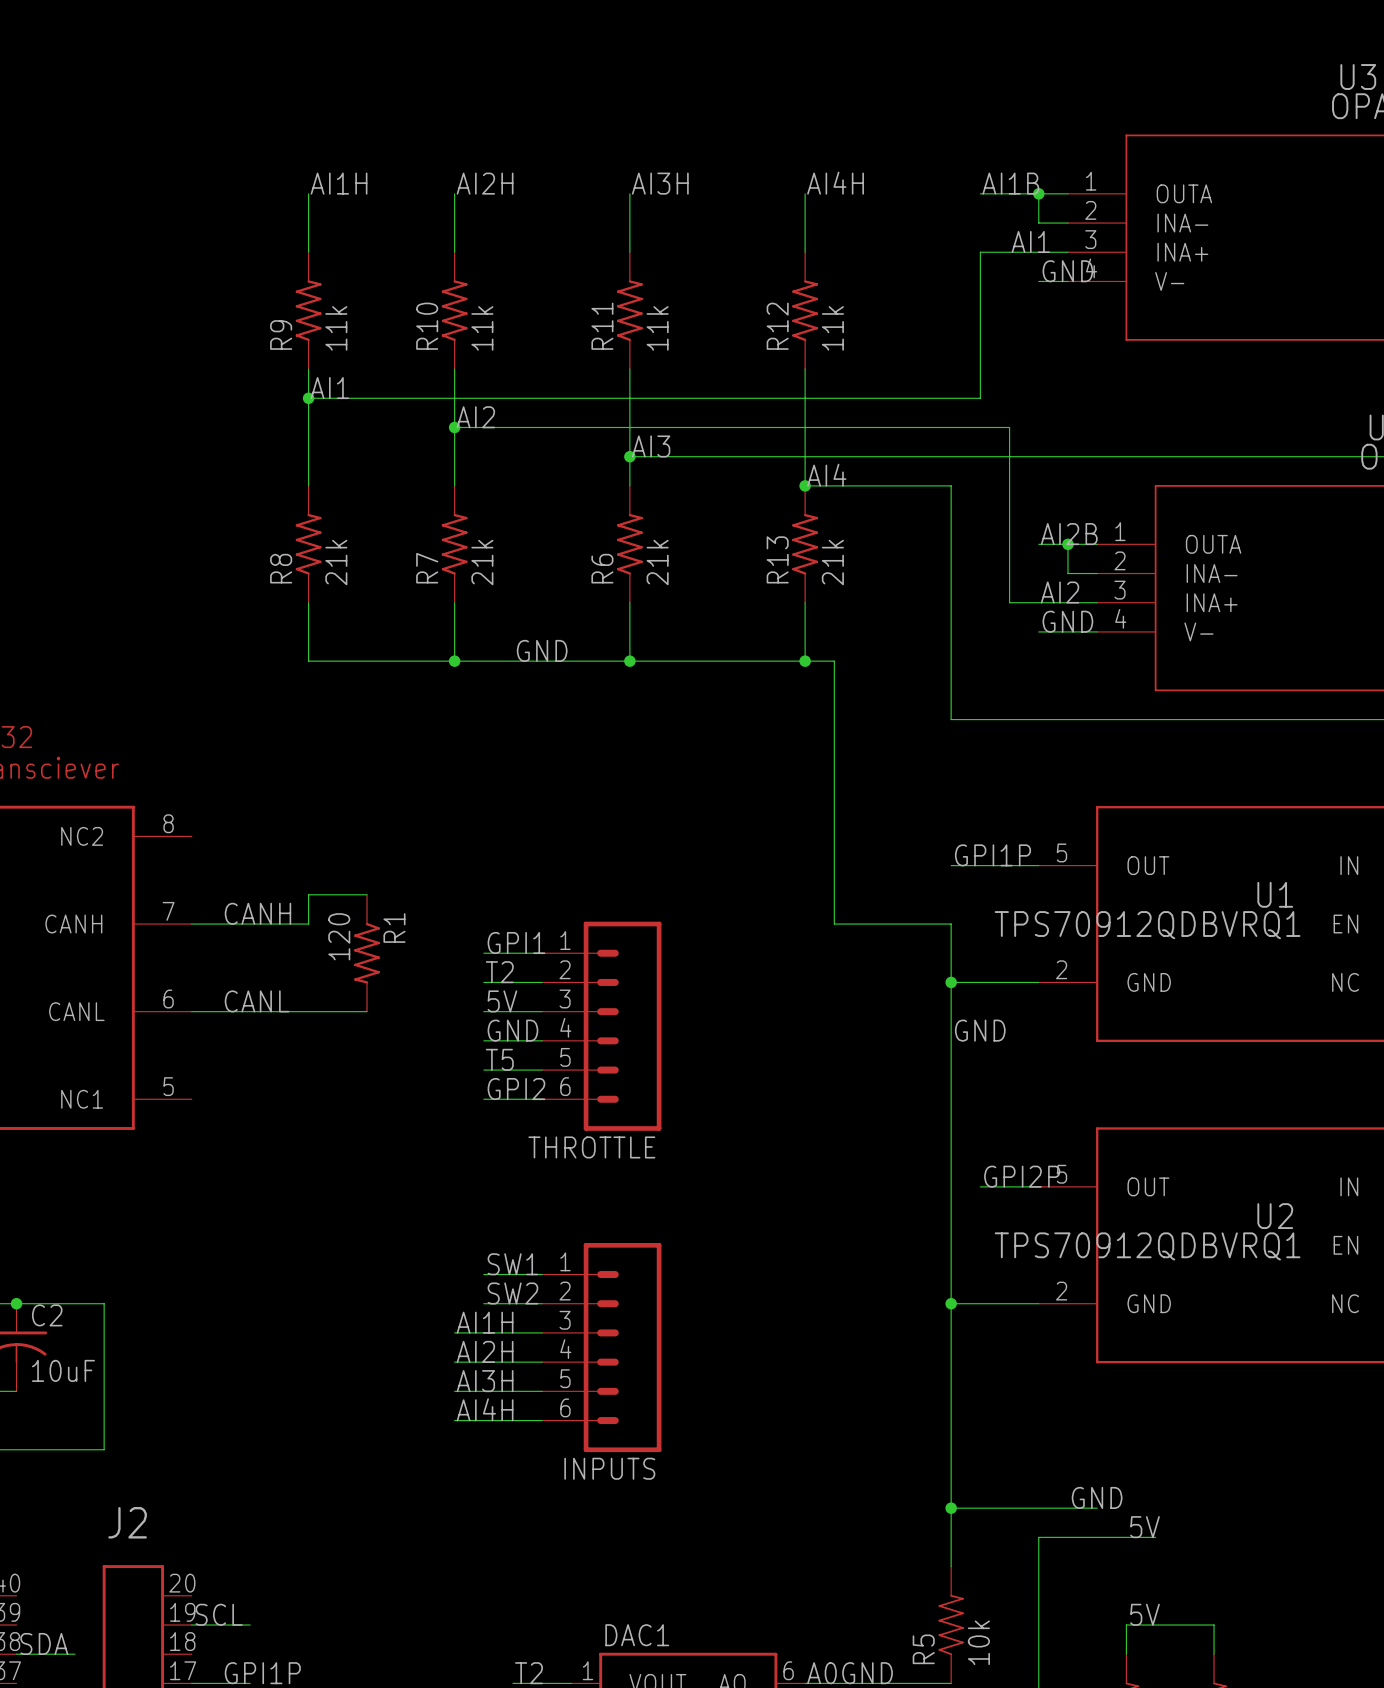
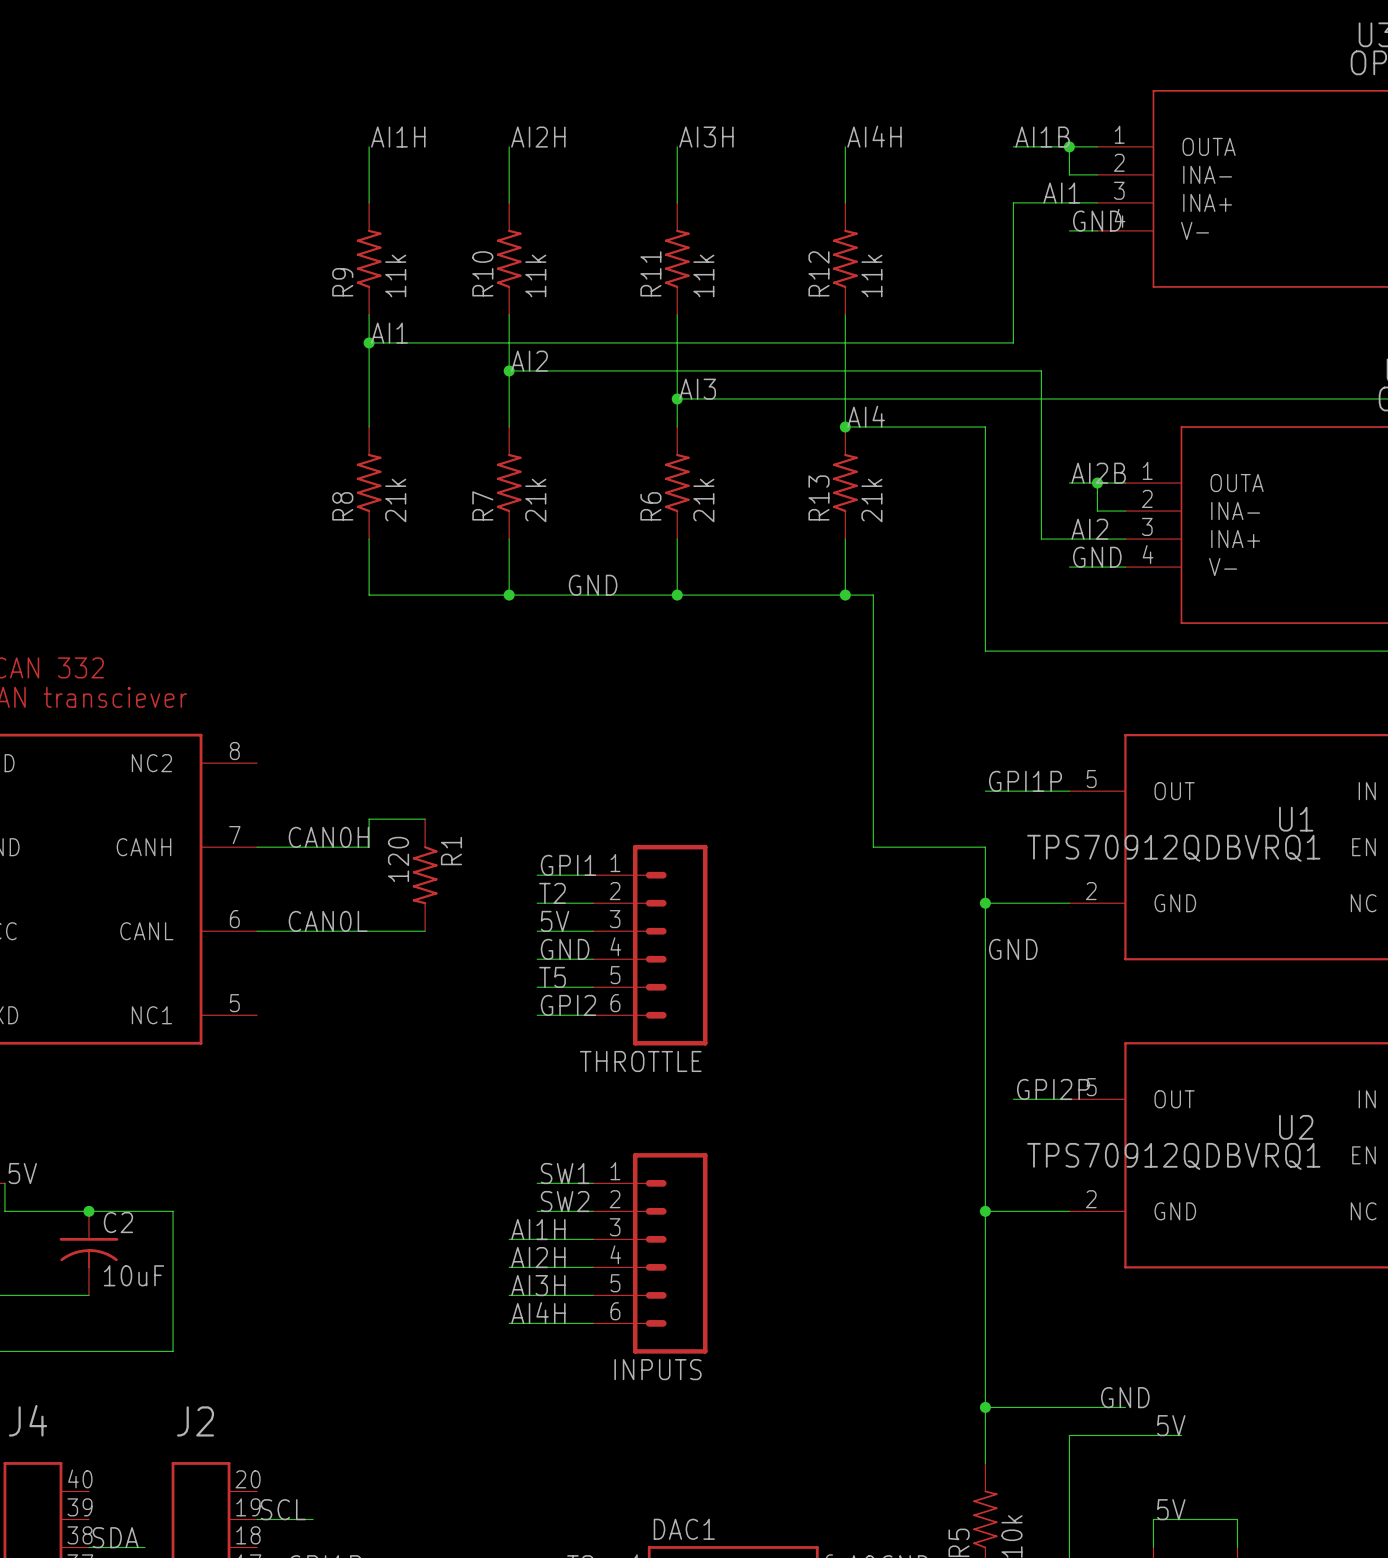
label: CANH (257, 913) -> CAN0H (328, 837)
label: CANL (257, 1001) -> CAN0L (328, 921)

